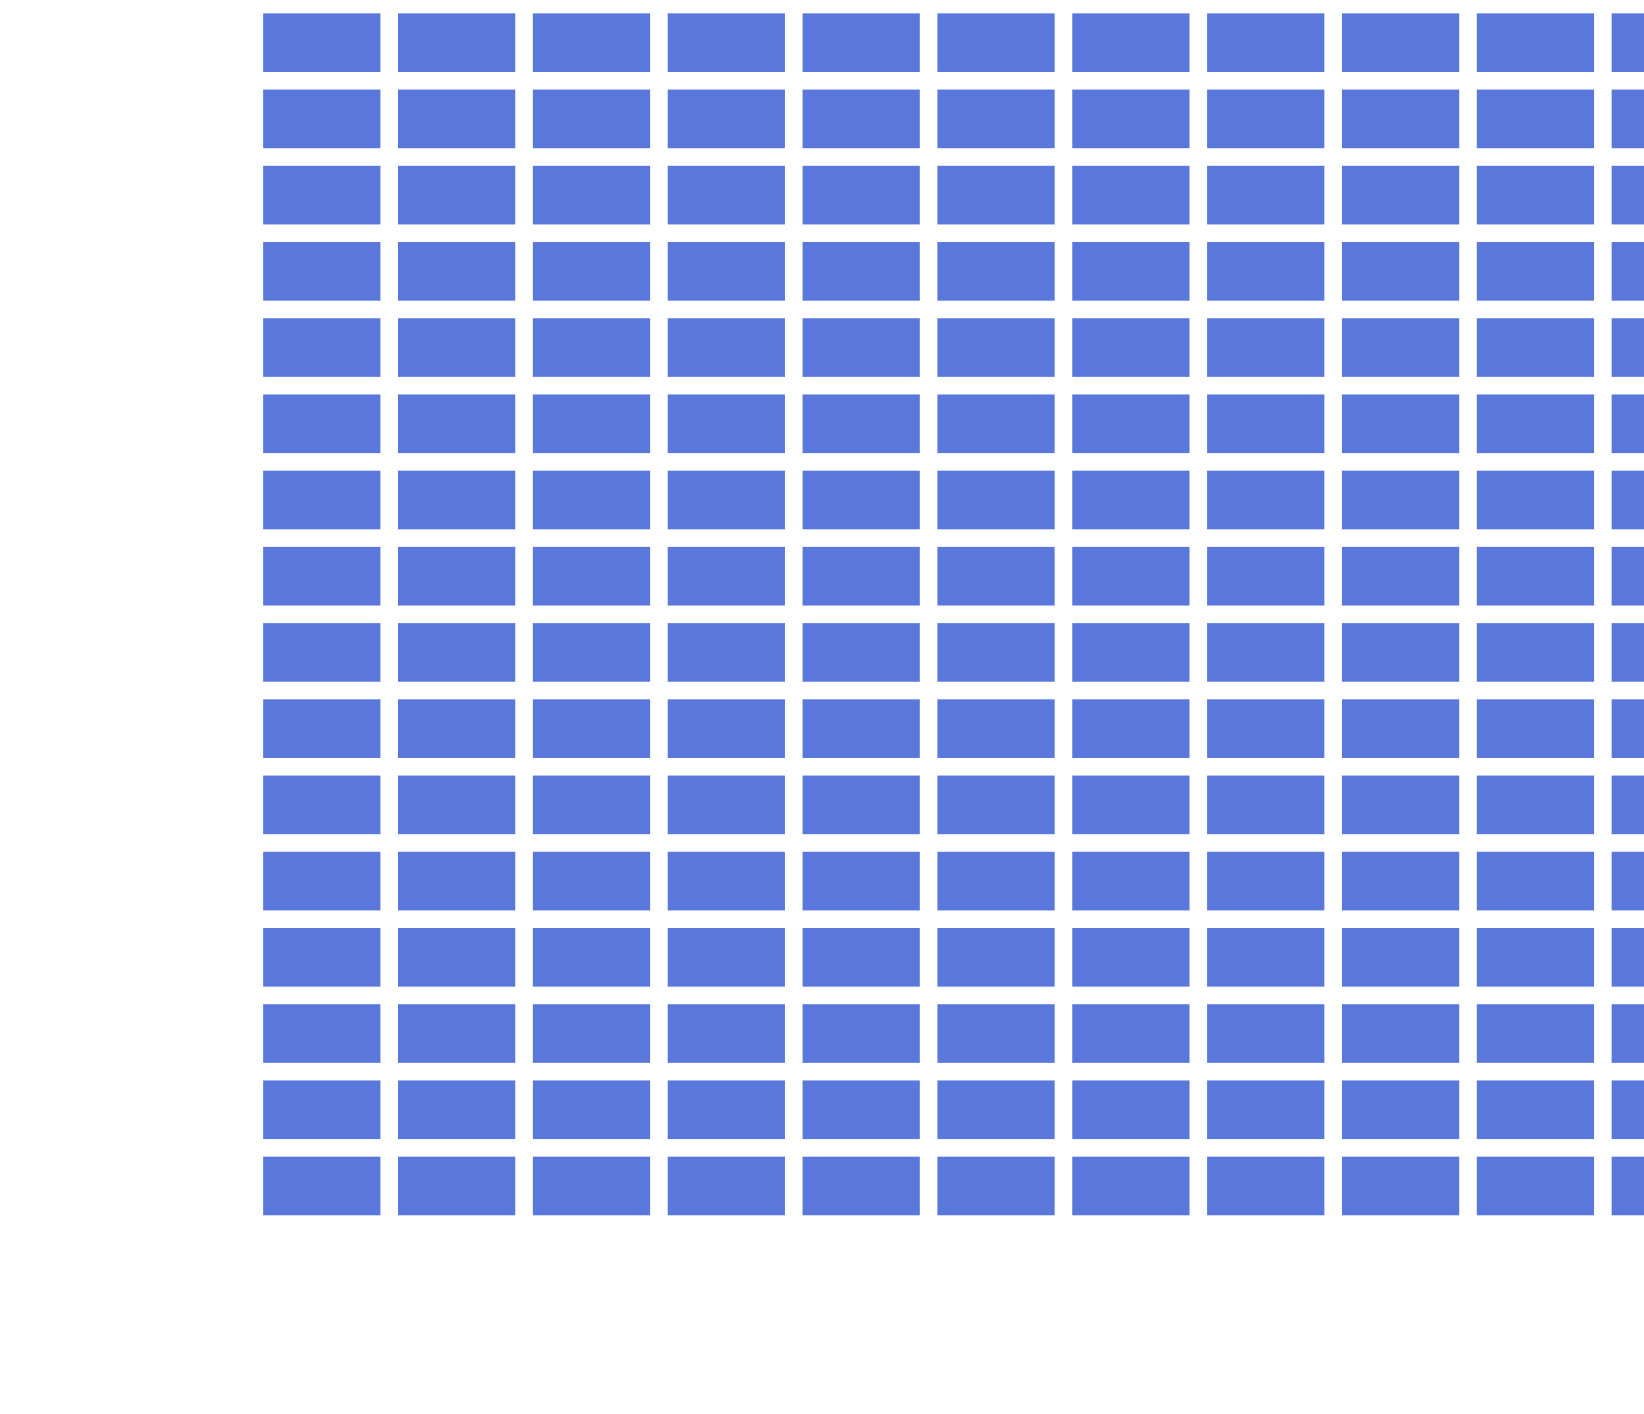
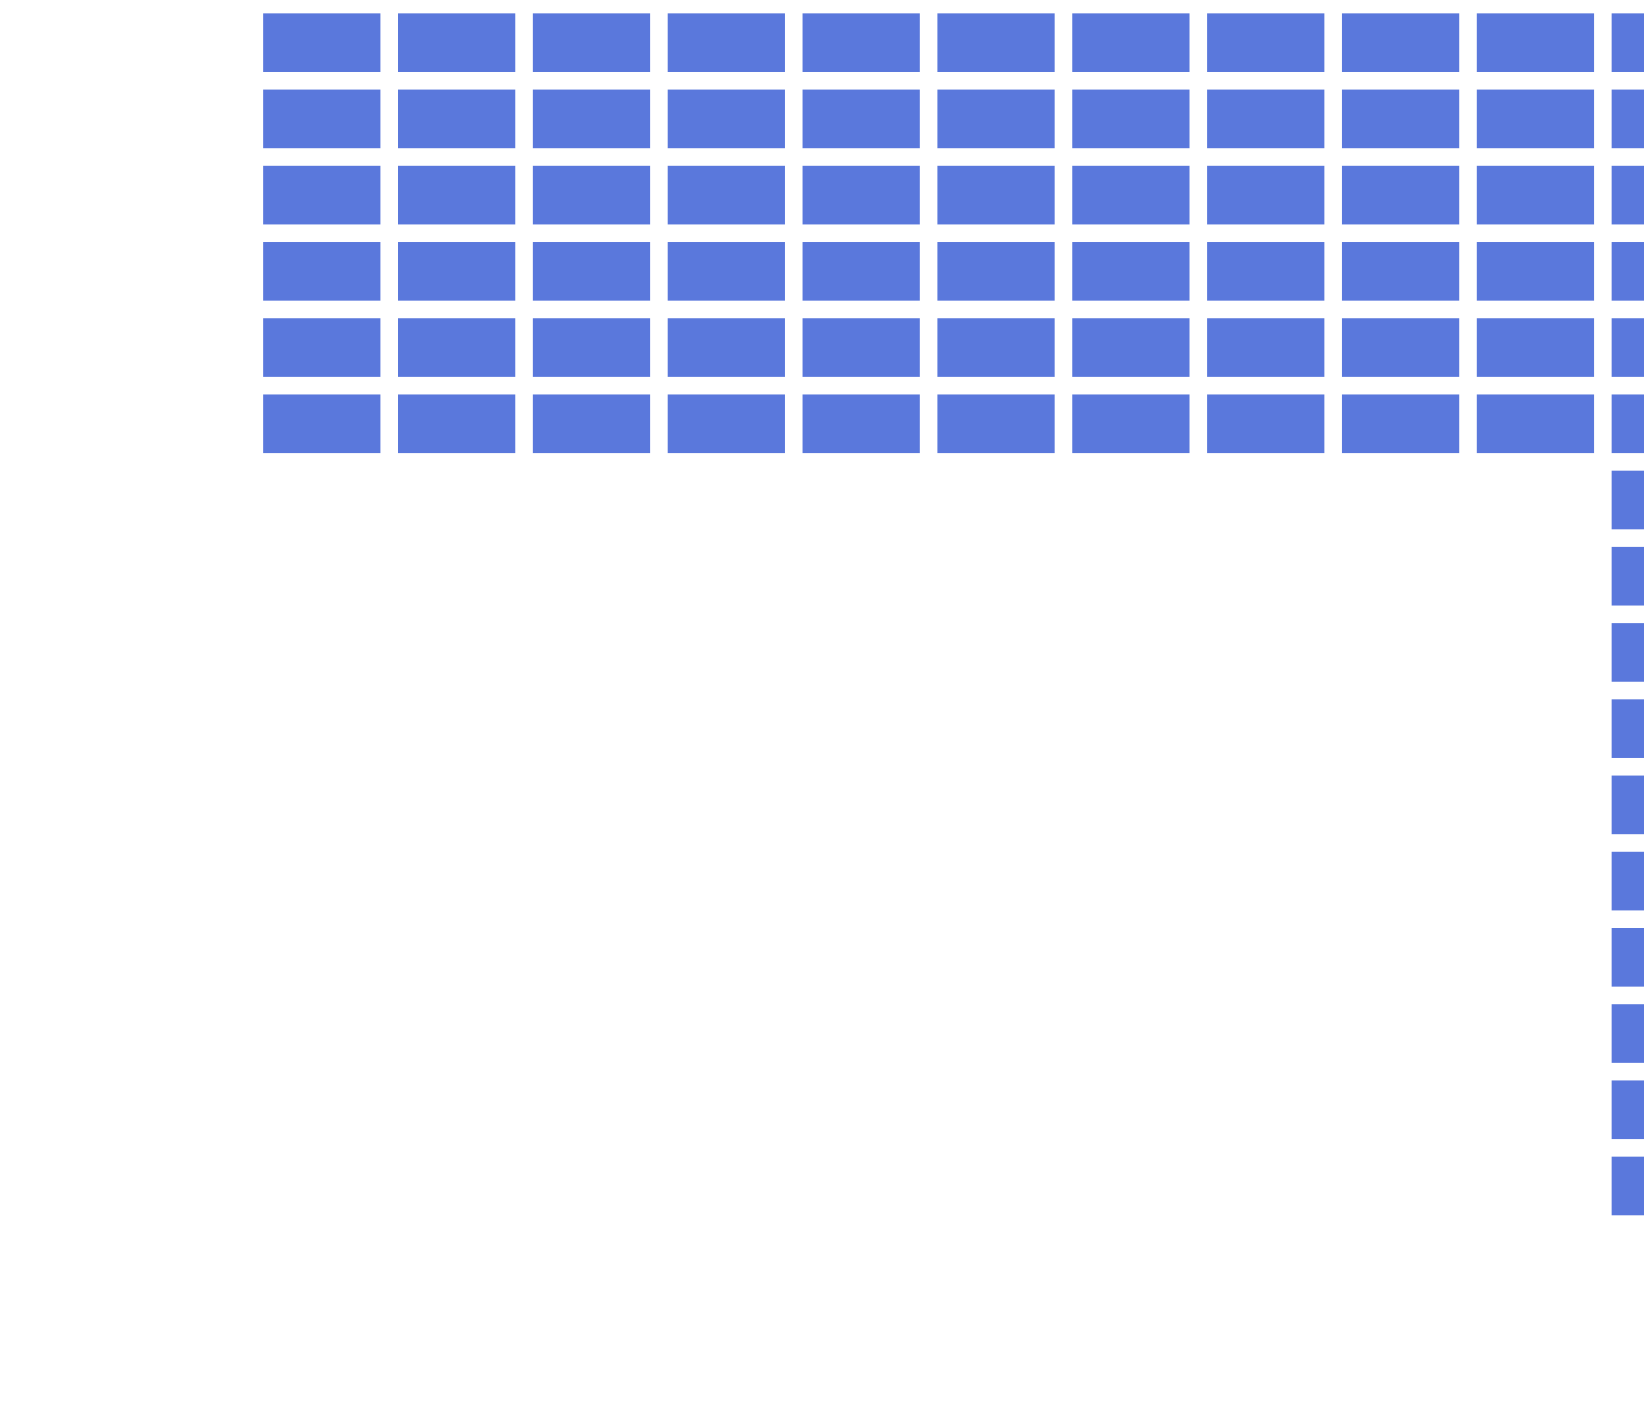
part: (928, 842) -> none

